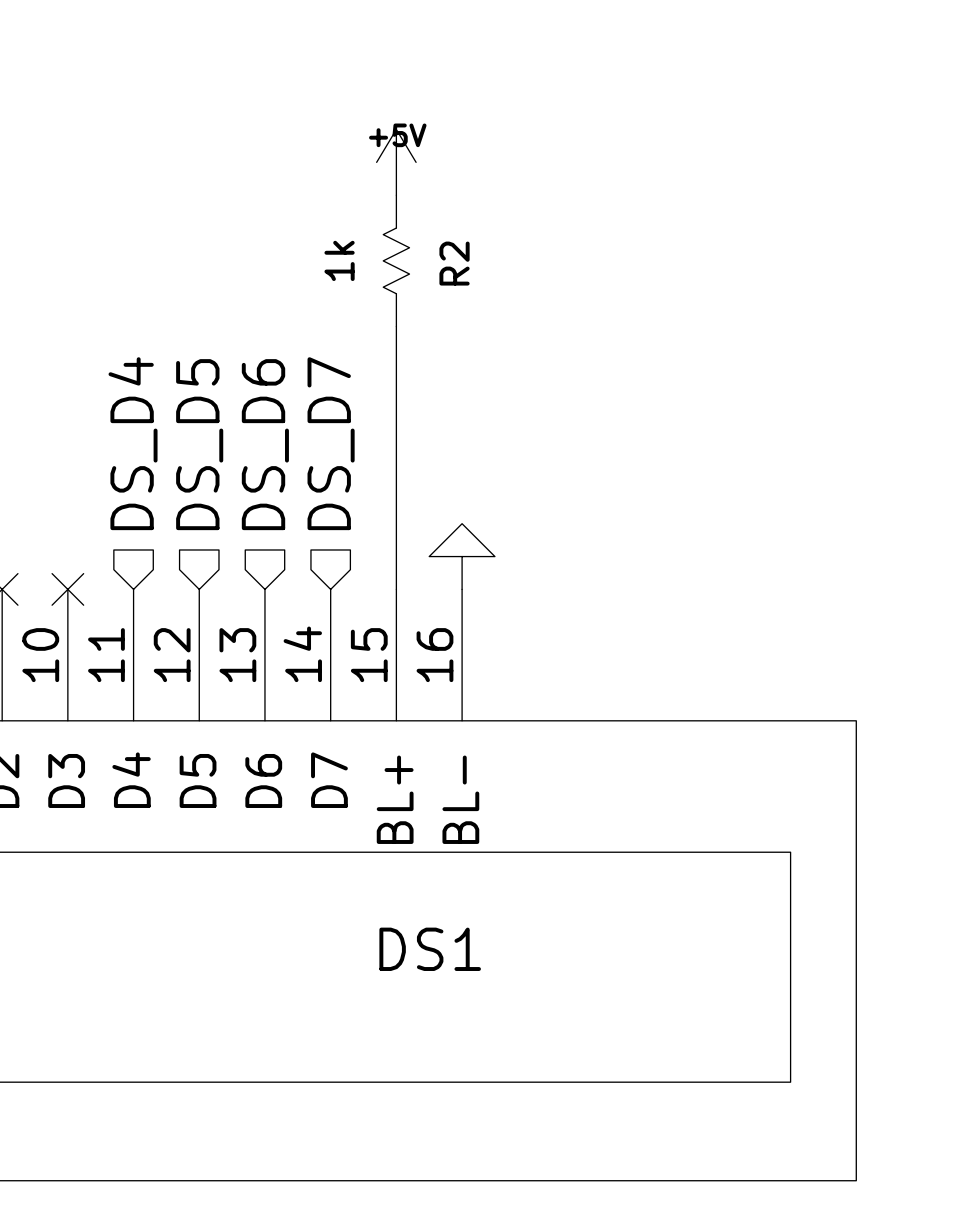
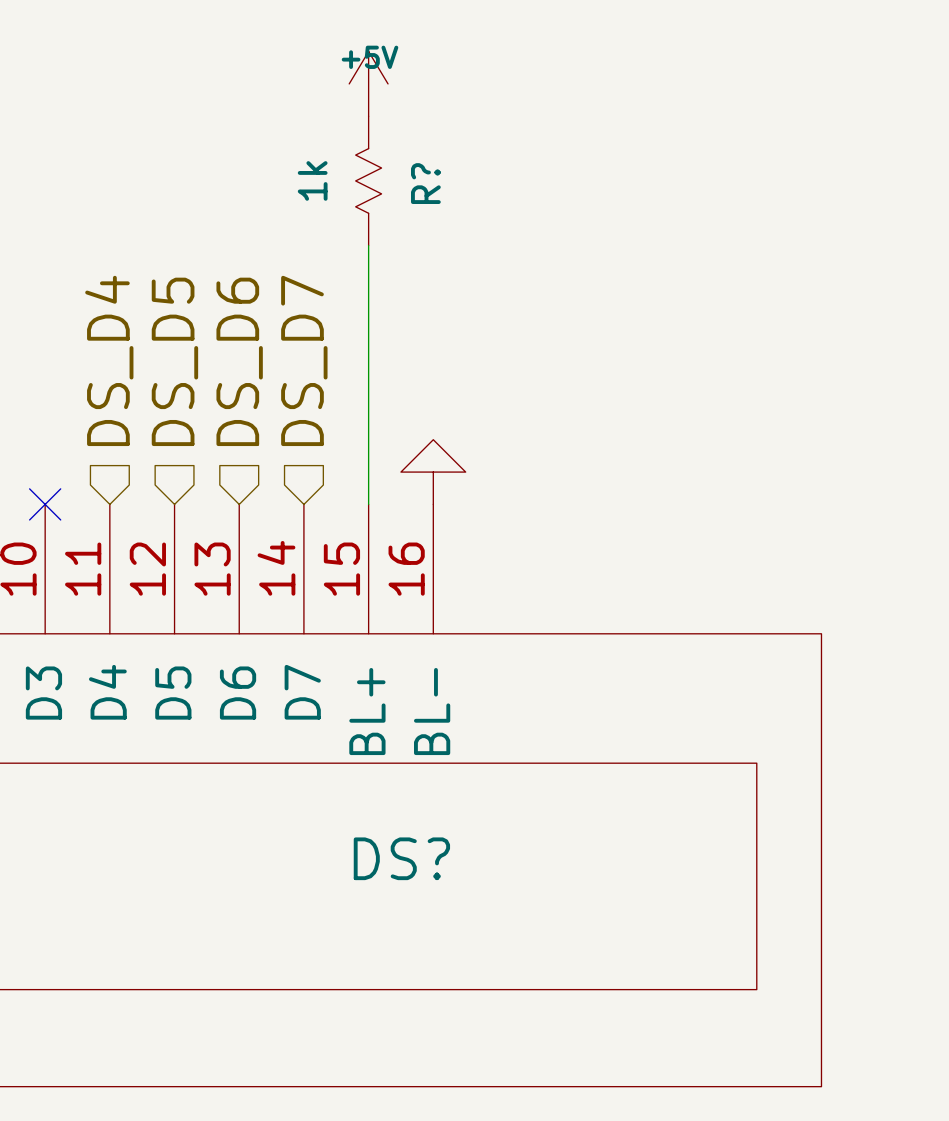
R2 name: R2 (454, 263) -> R? (425, 183)
DS1 name: DS1 (430, 949) -> DS? (401, 858)

